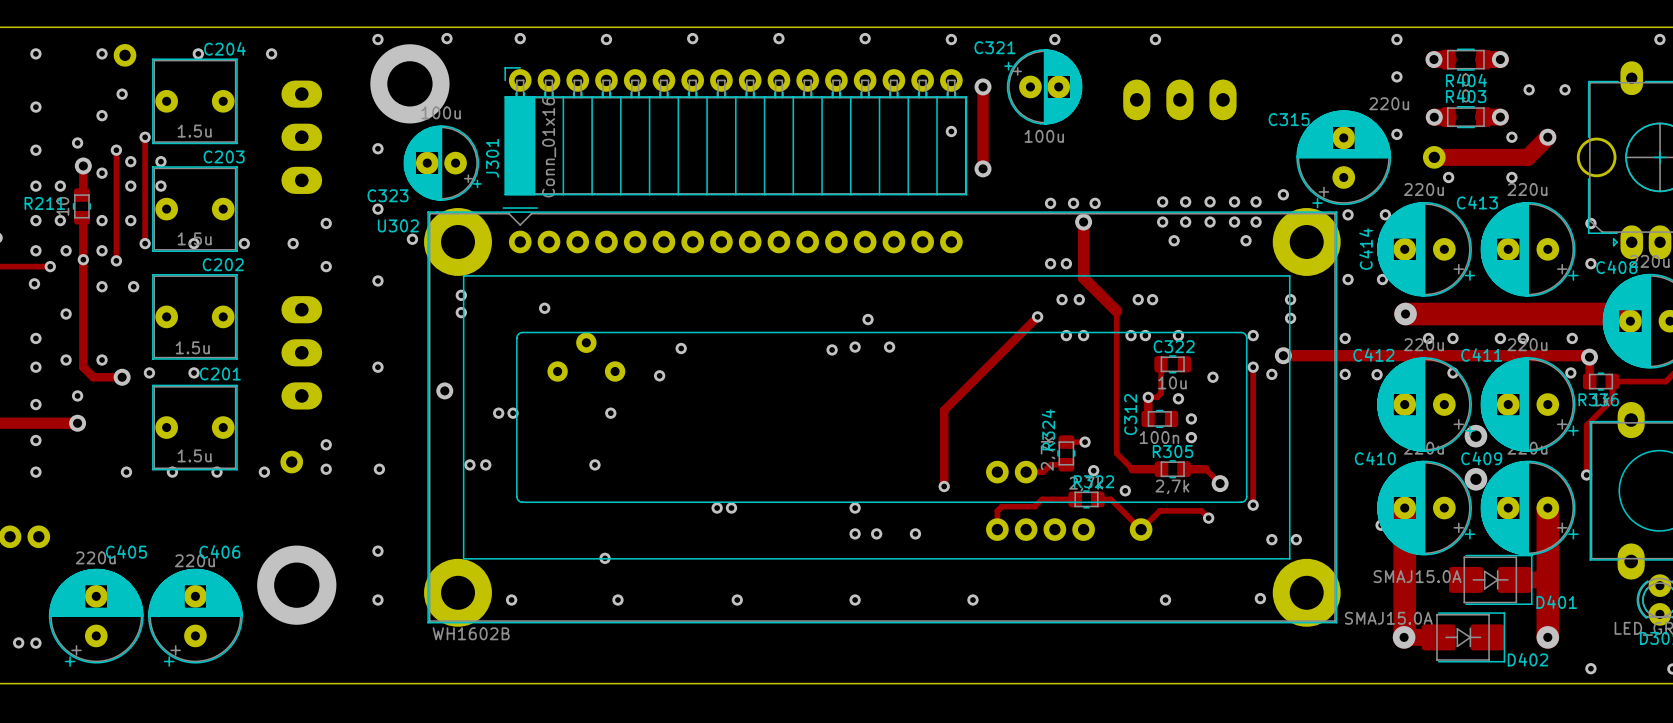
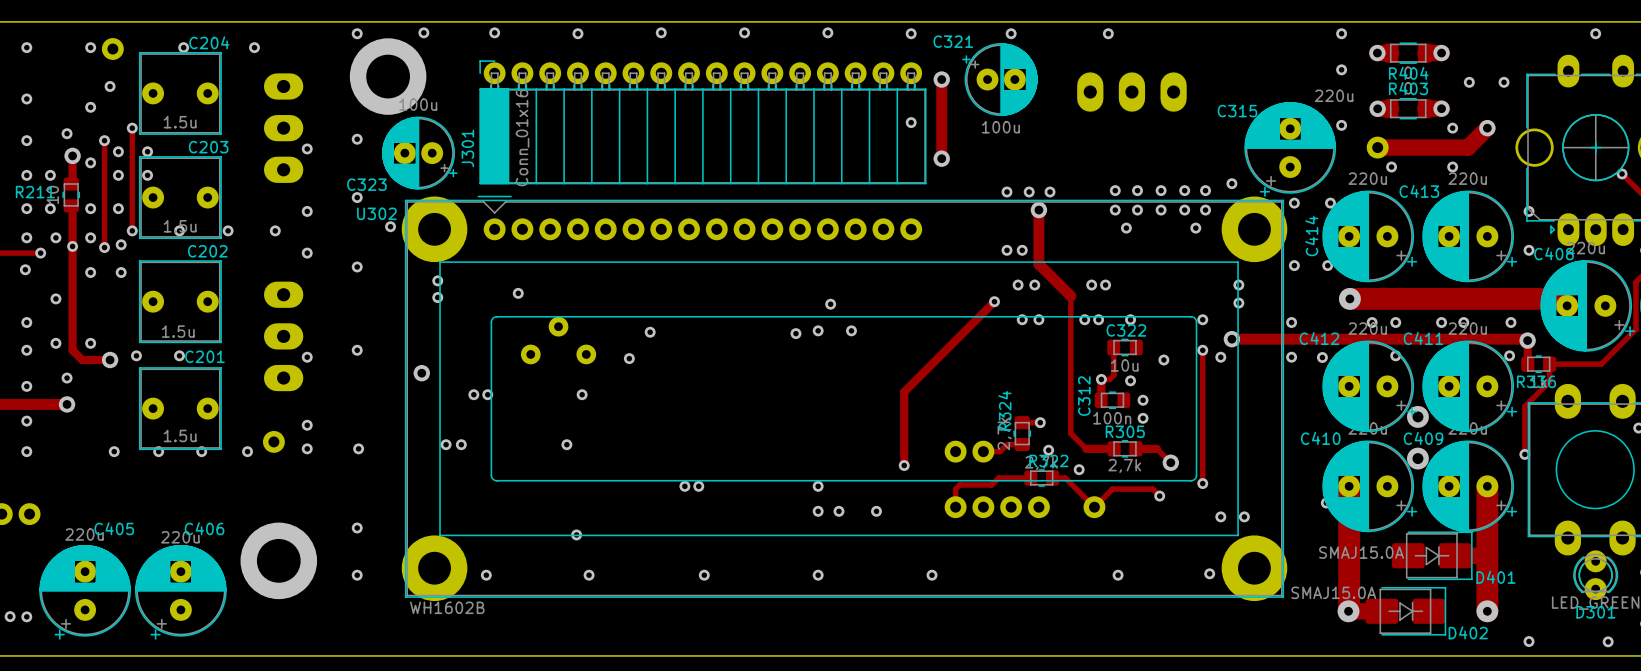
via: none -> (307, 148)
via: none -> (121, 244)
via: none -> (307, 357)

